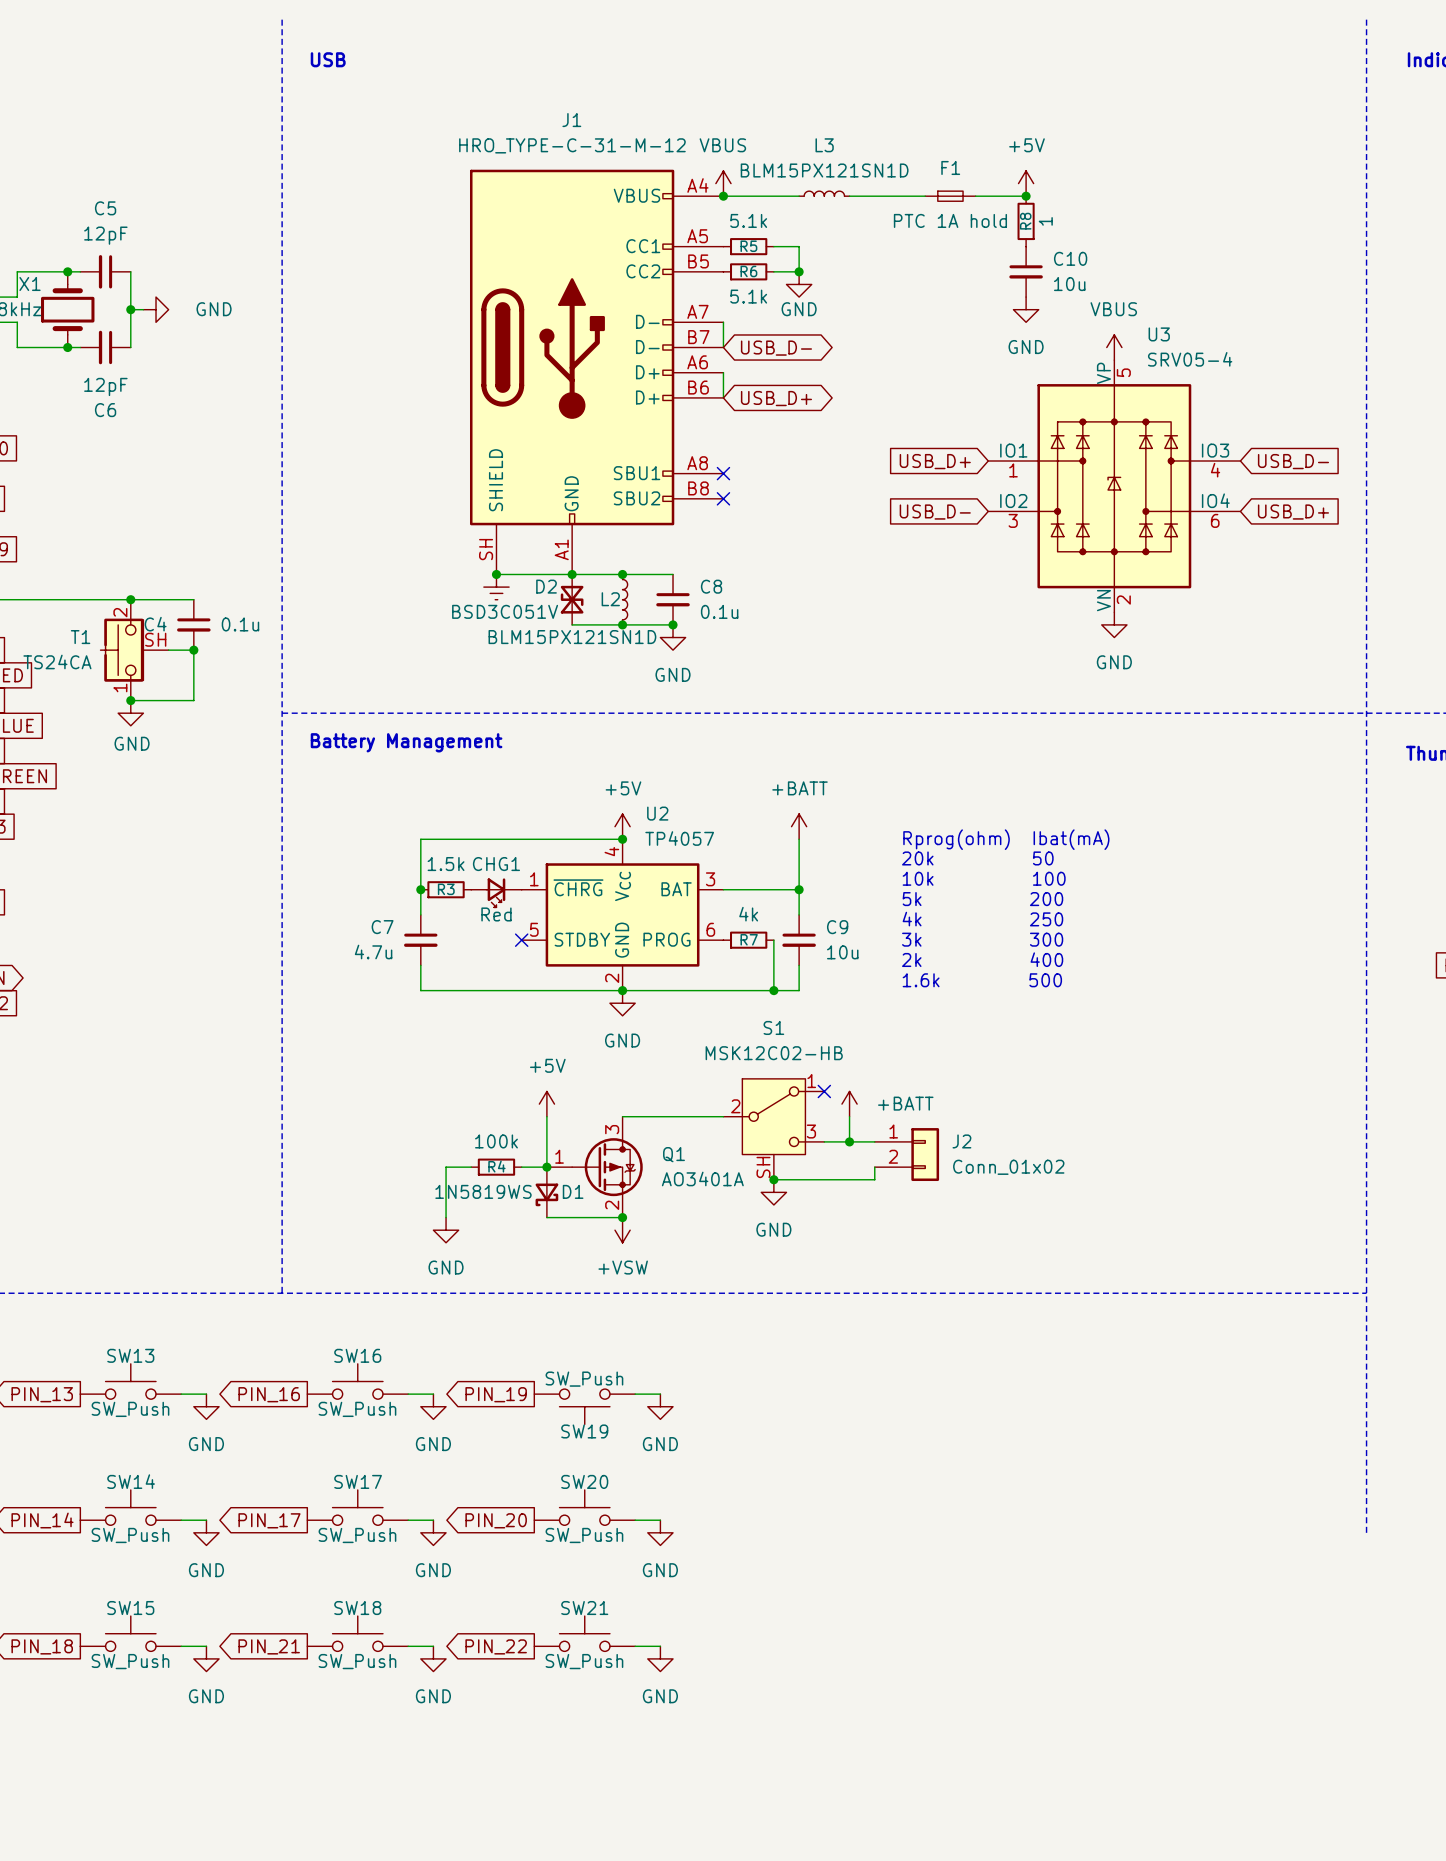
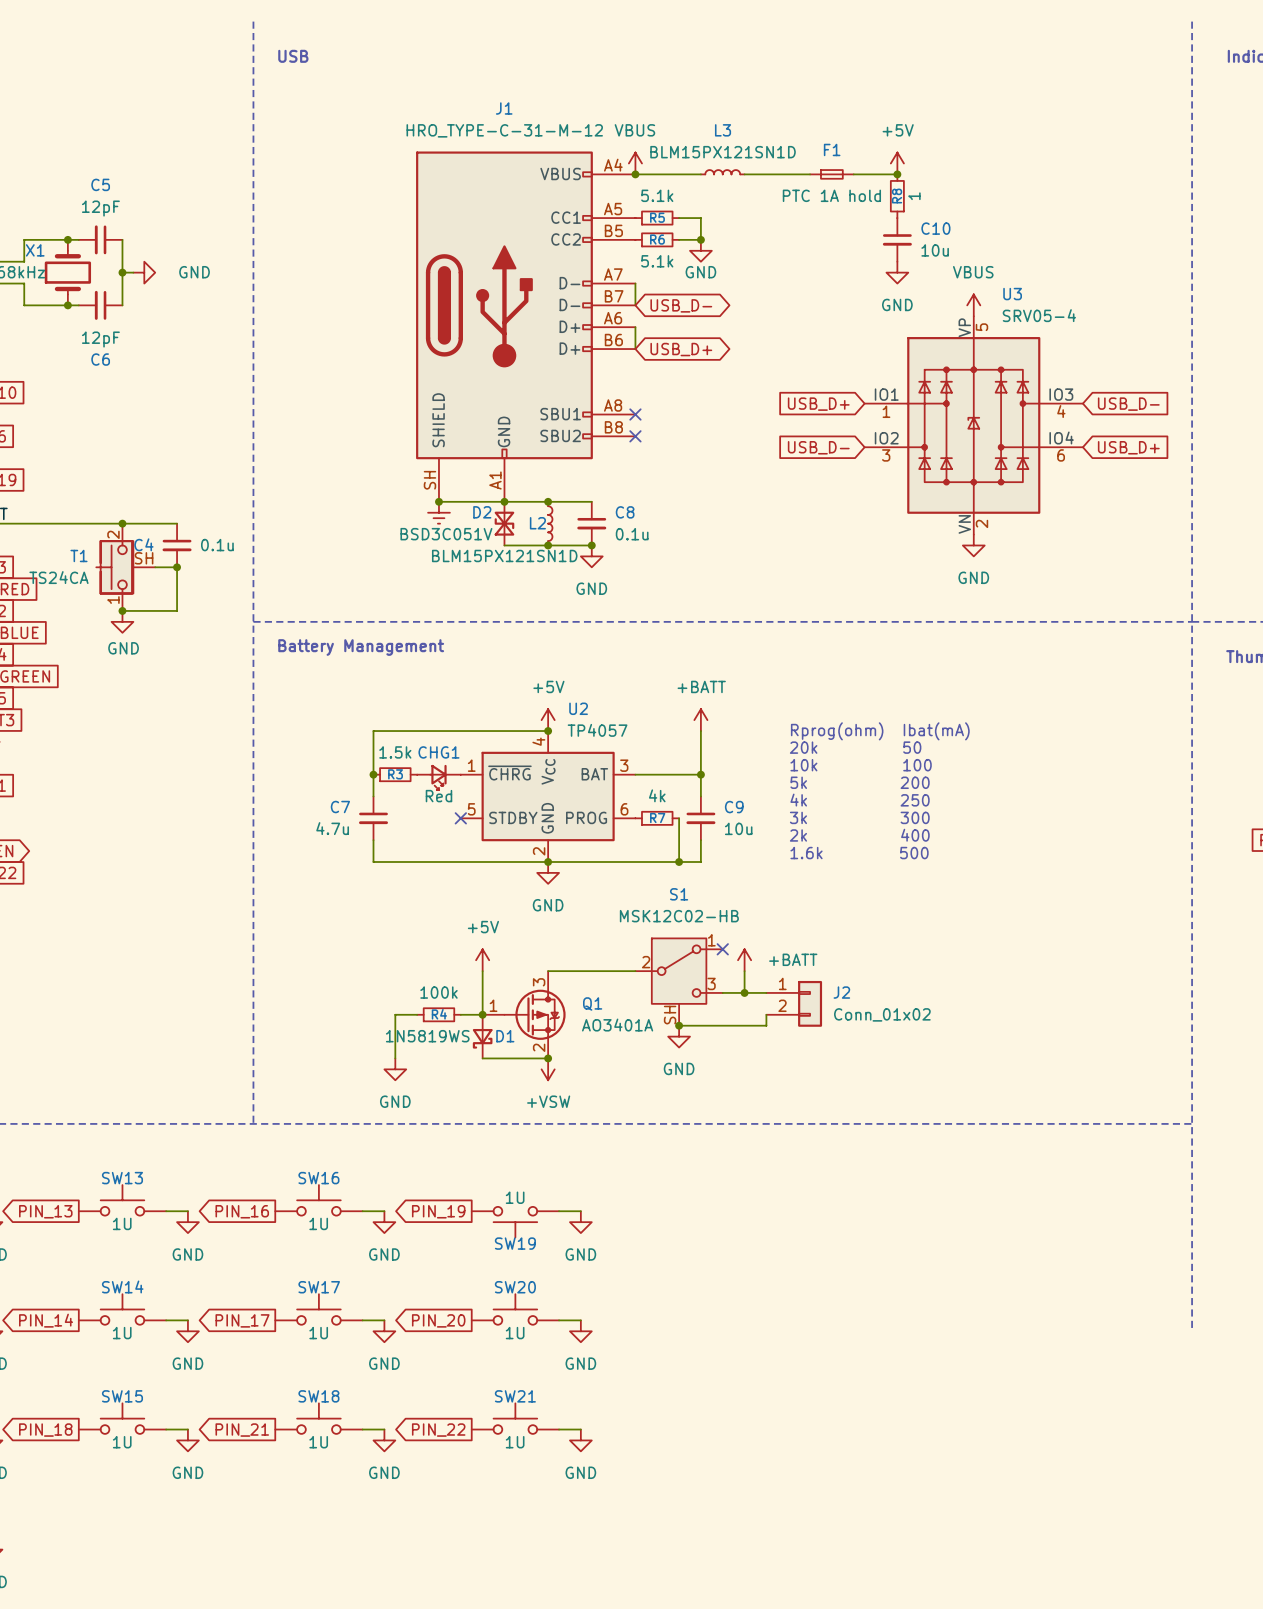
SW19 value: SW_Push (584, 1379) -> 1U (515, 1197)
SW13 value: SW_Push (130, 1409) -> 1U (122, 1223)
SW16 value: SW_Push (357, 1409) -> 1U (318, 1223)
SW14 value: SW_Push (130, 1535) -> 1U (122, 1333)
SW17 value: SW_Push (357, 1535) -> 1U (318, 1333)
SW20 value: SW_Push (584, 1535) -> 1U (515, 1333)
SW15 value: SW_Push (130, 1661) -> 1U (122, 1442)
SW18 value: SW_Push (357, 1661) -> 1U (318, 1442)
SW21 value: SW_Push (584, 1661) -> 1U (515, 1442)

